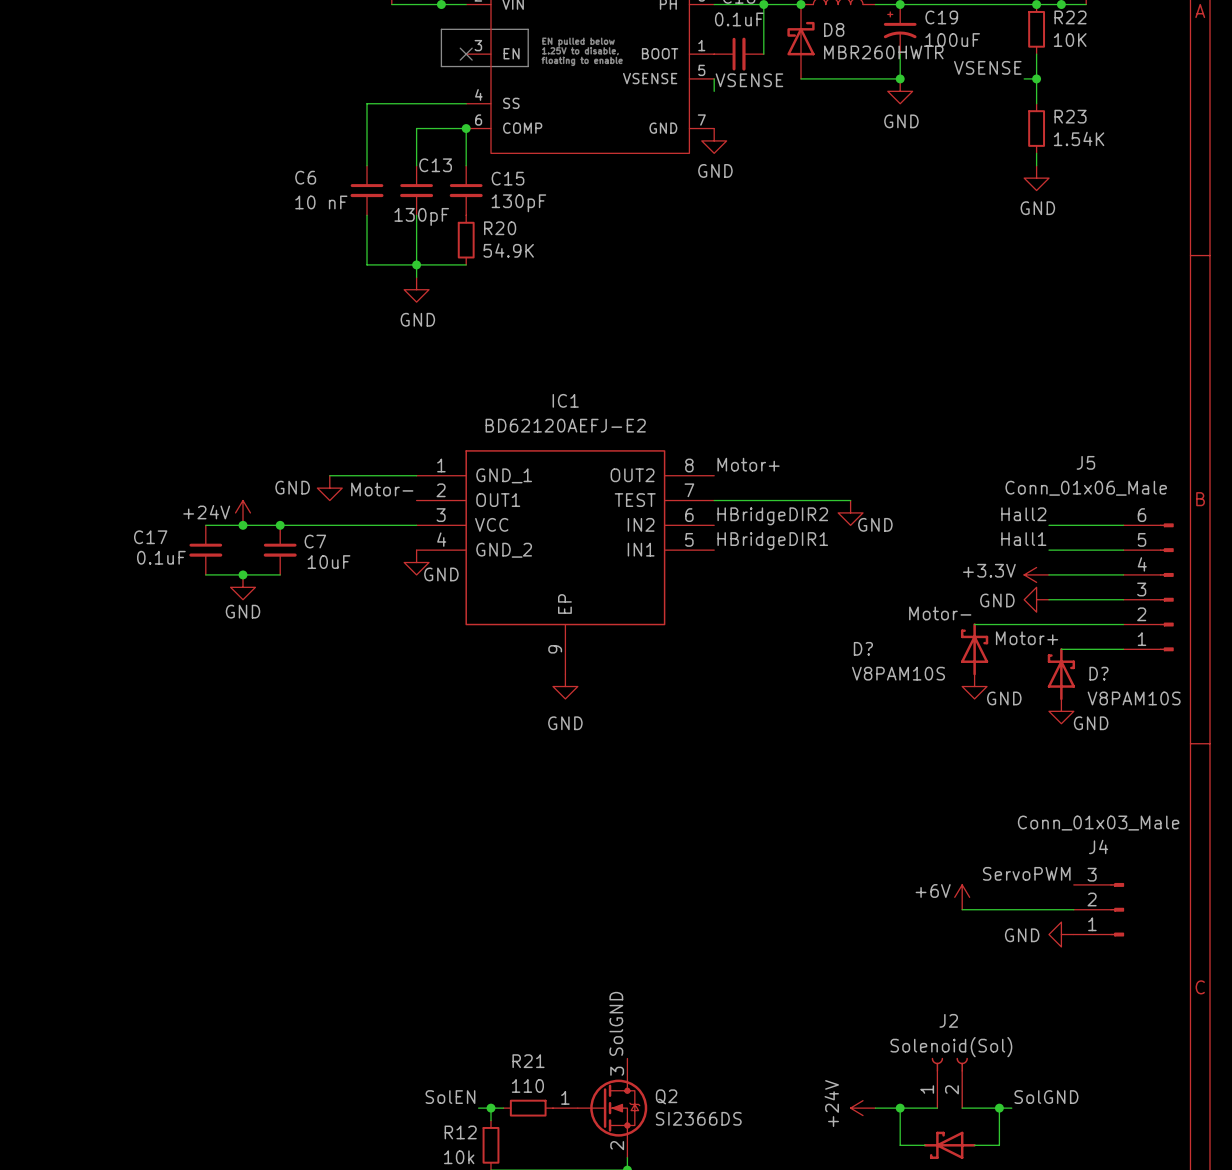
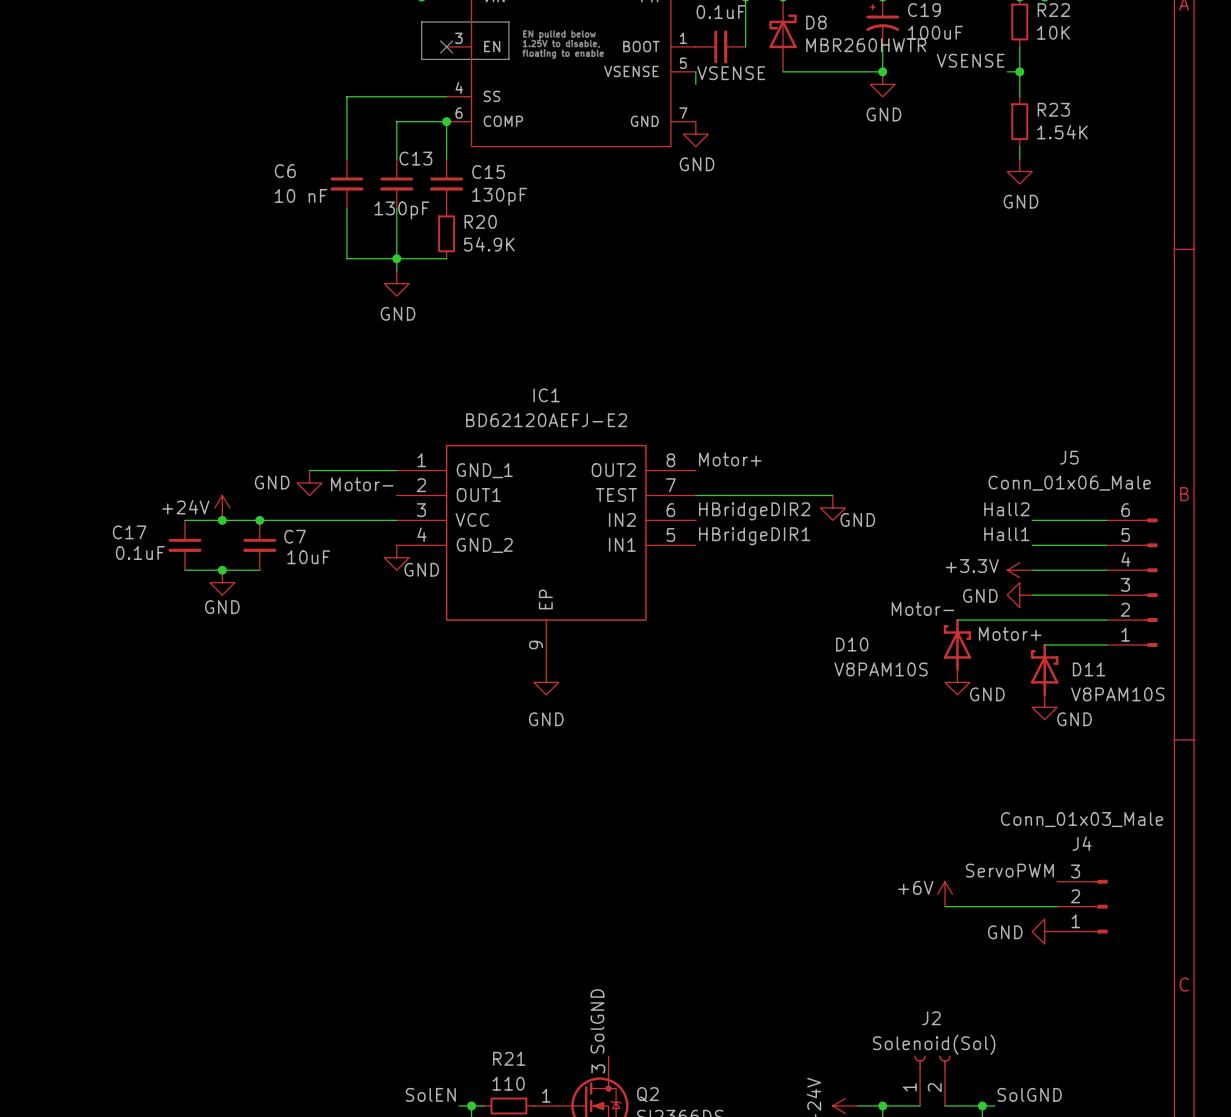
D? name: D? (863, 648) -> D10 (852, 644)
D? name: D? (1098, 673) -> D11 (1088, 669)

